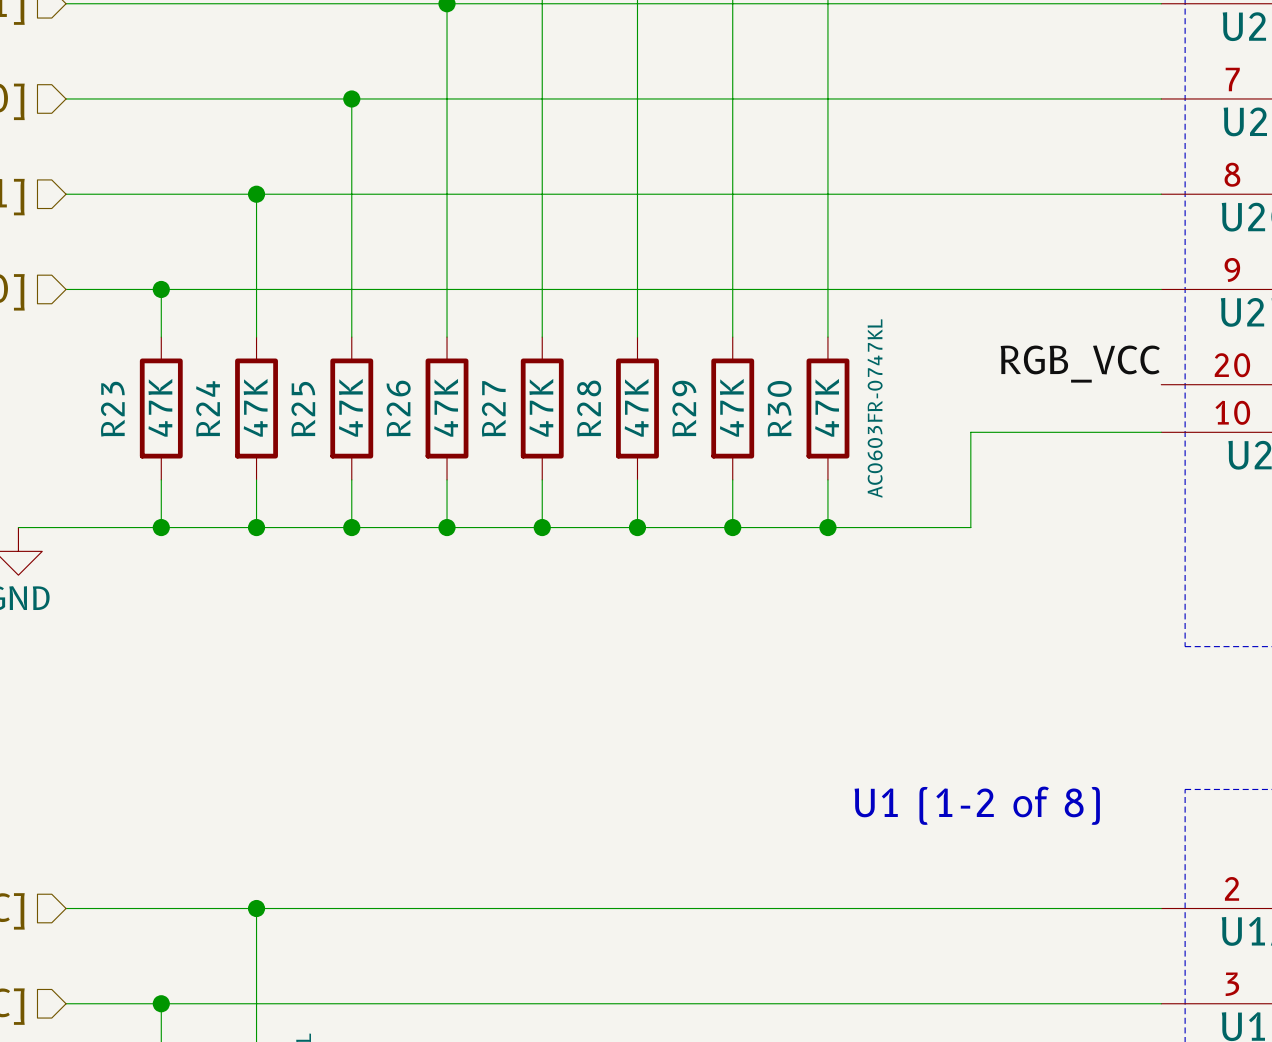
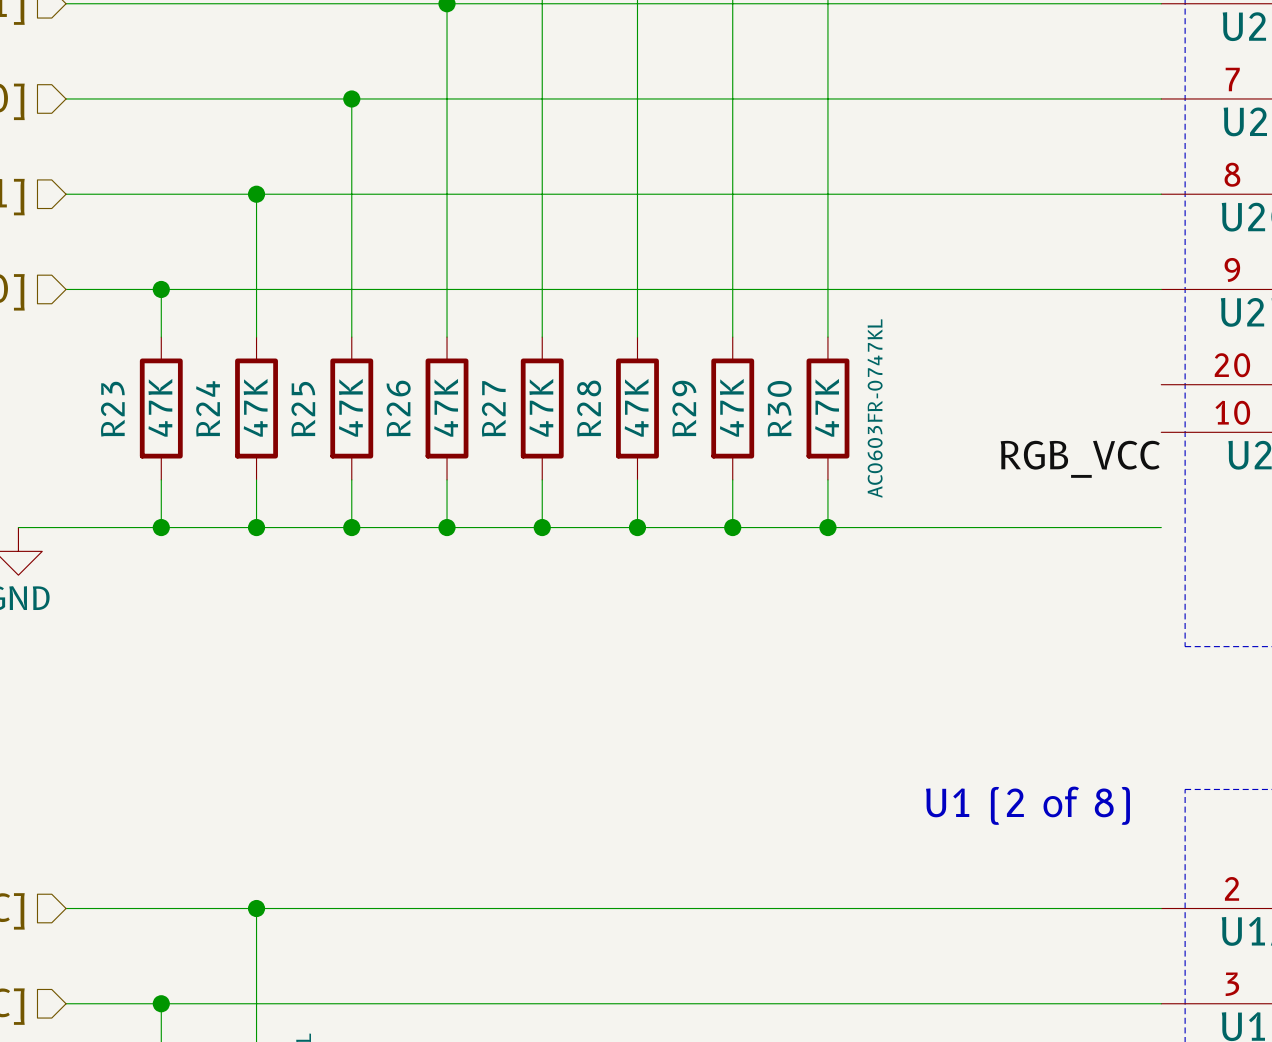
label position: RGB_VCC (1080, 364) -> RGB_VCC (1080, 459)
wire: (1161, 432) (970, 432) (970, 527) -> (1161, 527) (970, 527)
text: U1 (1-2 of 8) (977, 805) -> U1 (2 of 8) (1027, 805)

